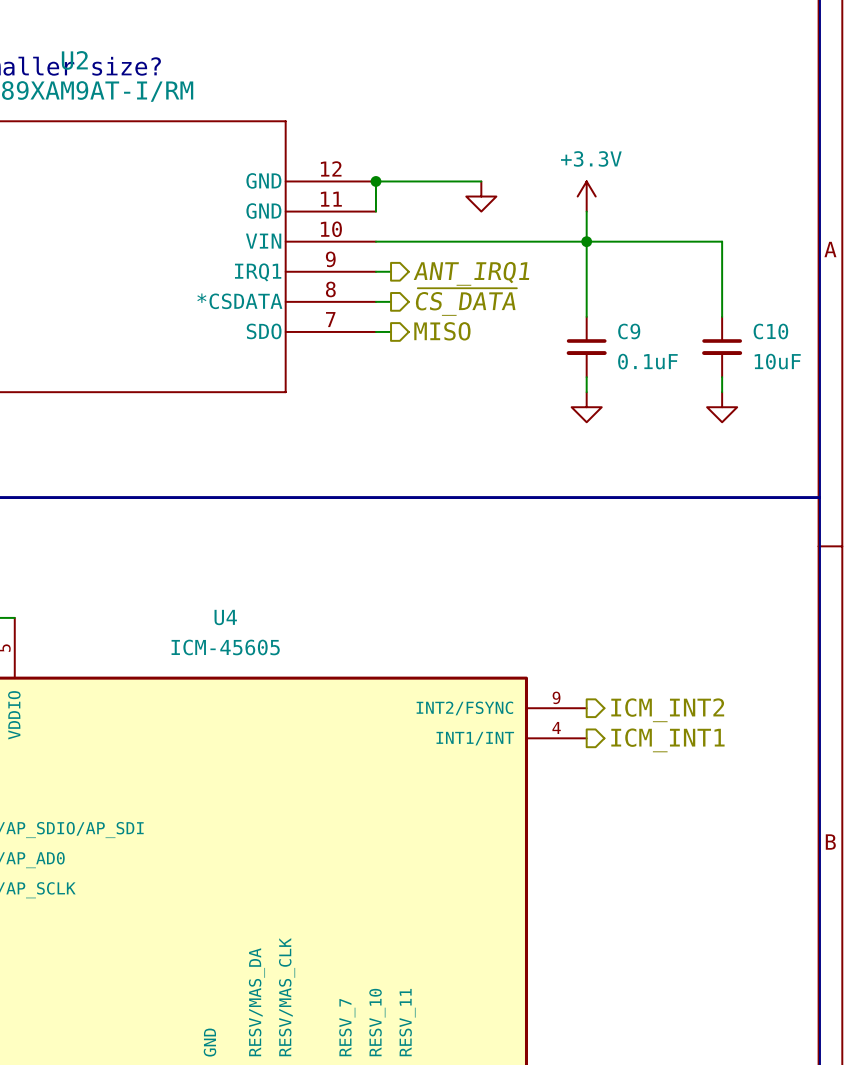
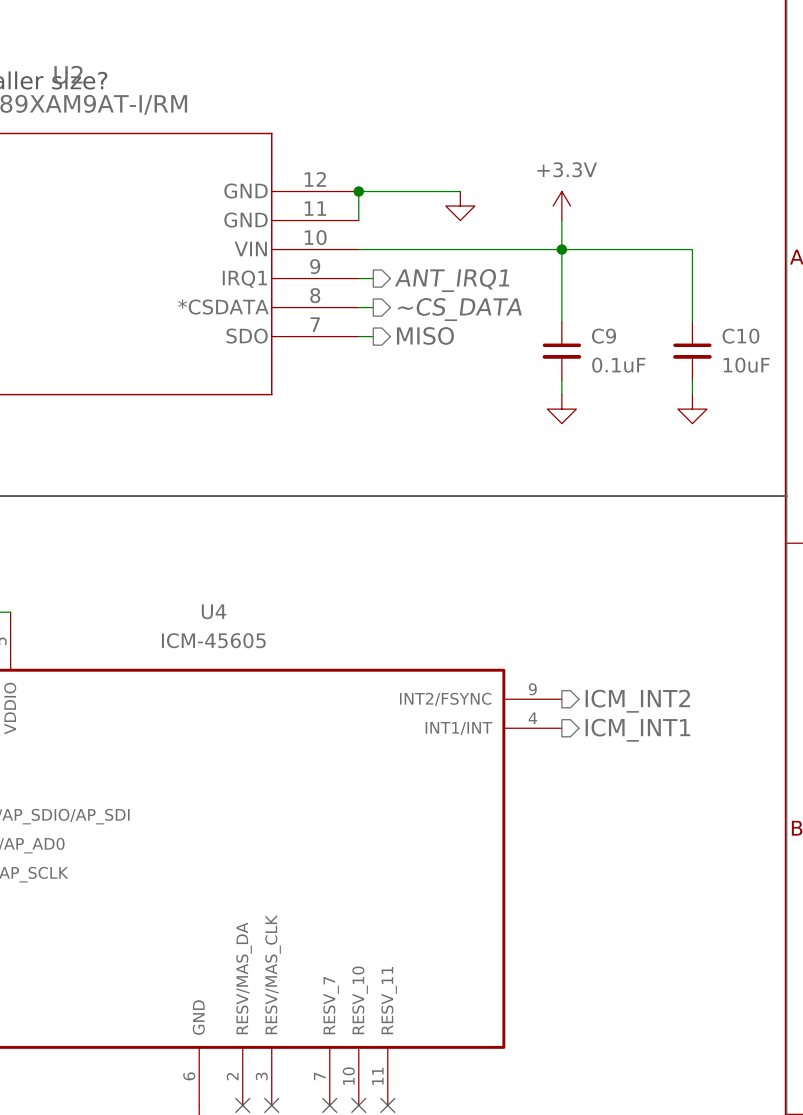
hierarchical label: ~{CS_DATA} (466, 302) -> ~CS_DATA (459, 309)

